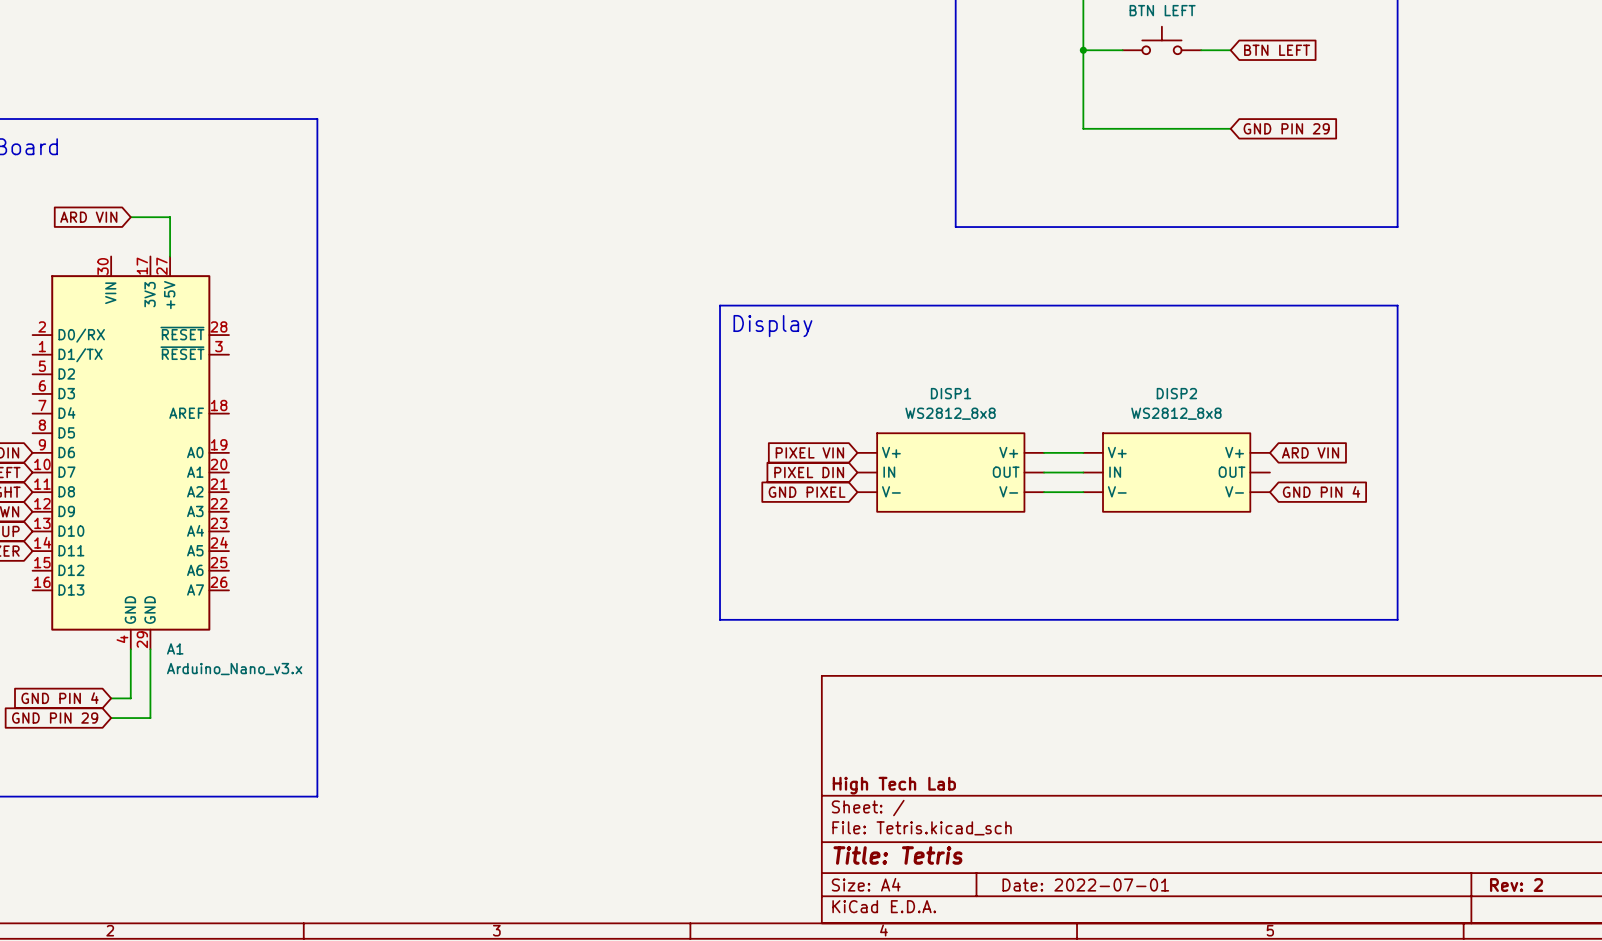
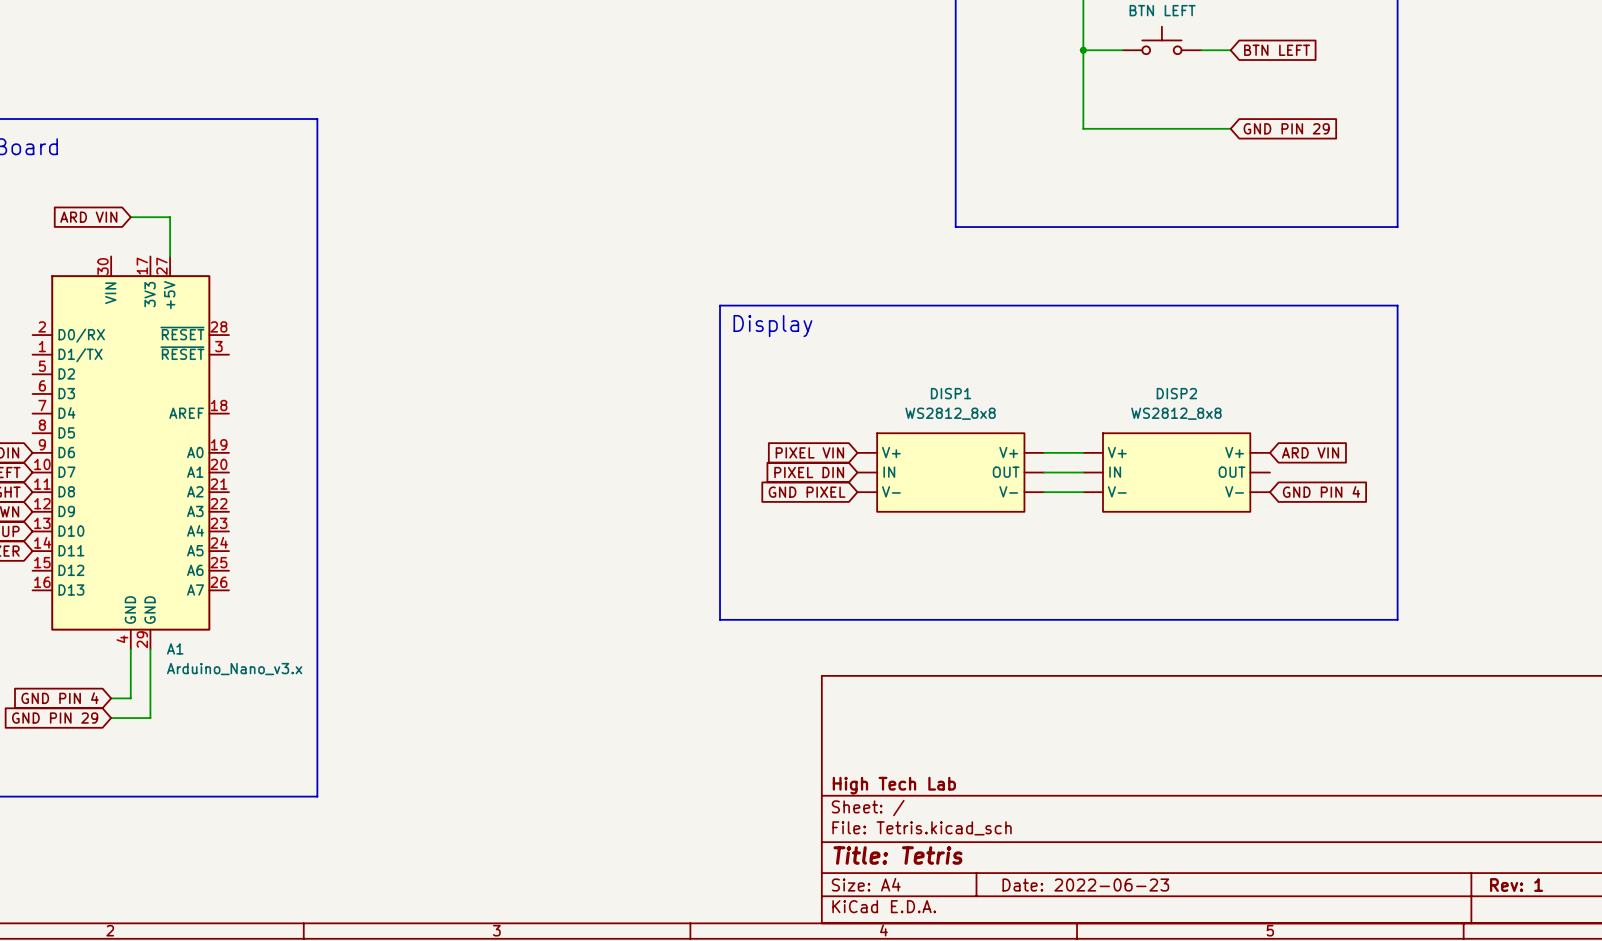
title block: Date: 2022-07-01 (1085, 885) -> Date: 2022-06-23 (1085, 885)
title block: Rev: 2 (1516, 885) -> Rev: 1 (1516, 885)

